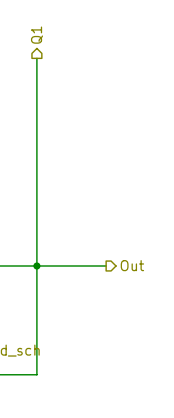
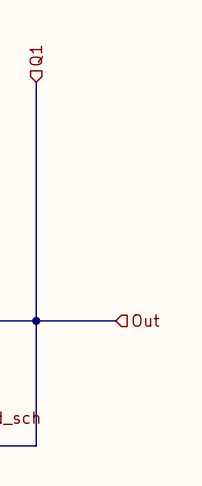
hierarchical label shape: output (37, 35) -> input (36, 55)
hierarchical label shape: output (132, 265) -> input (146, 320)

